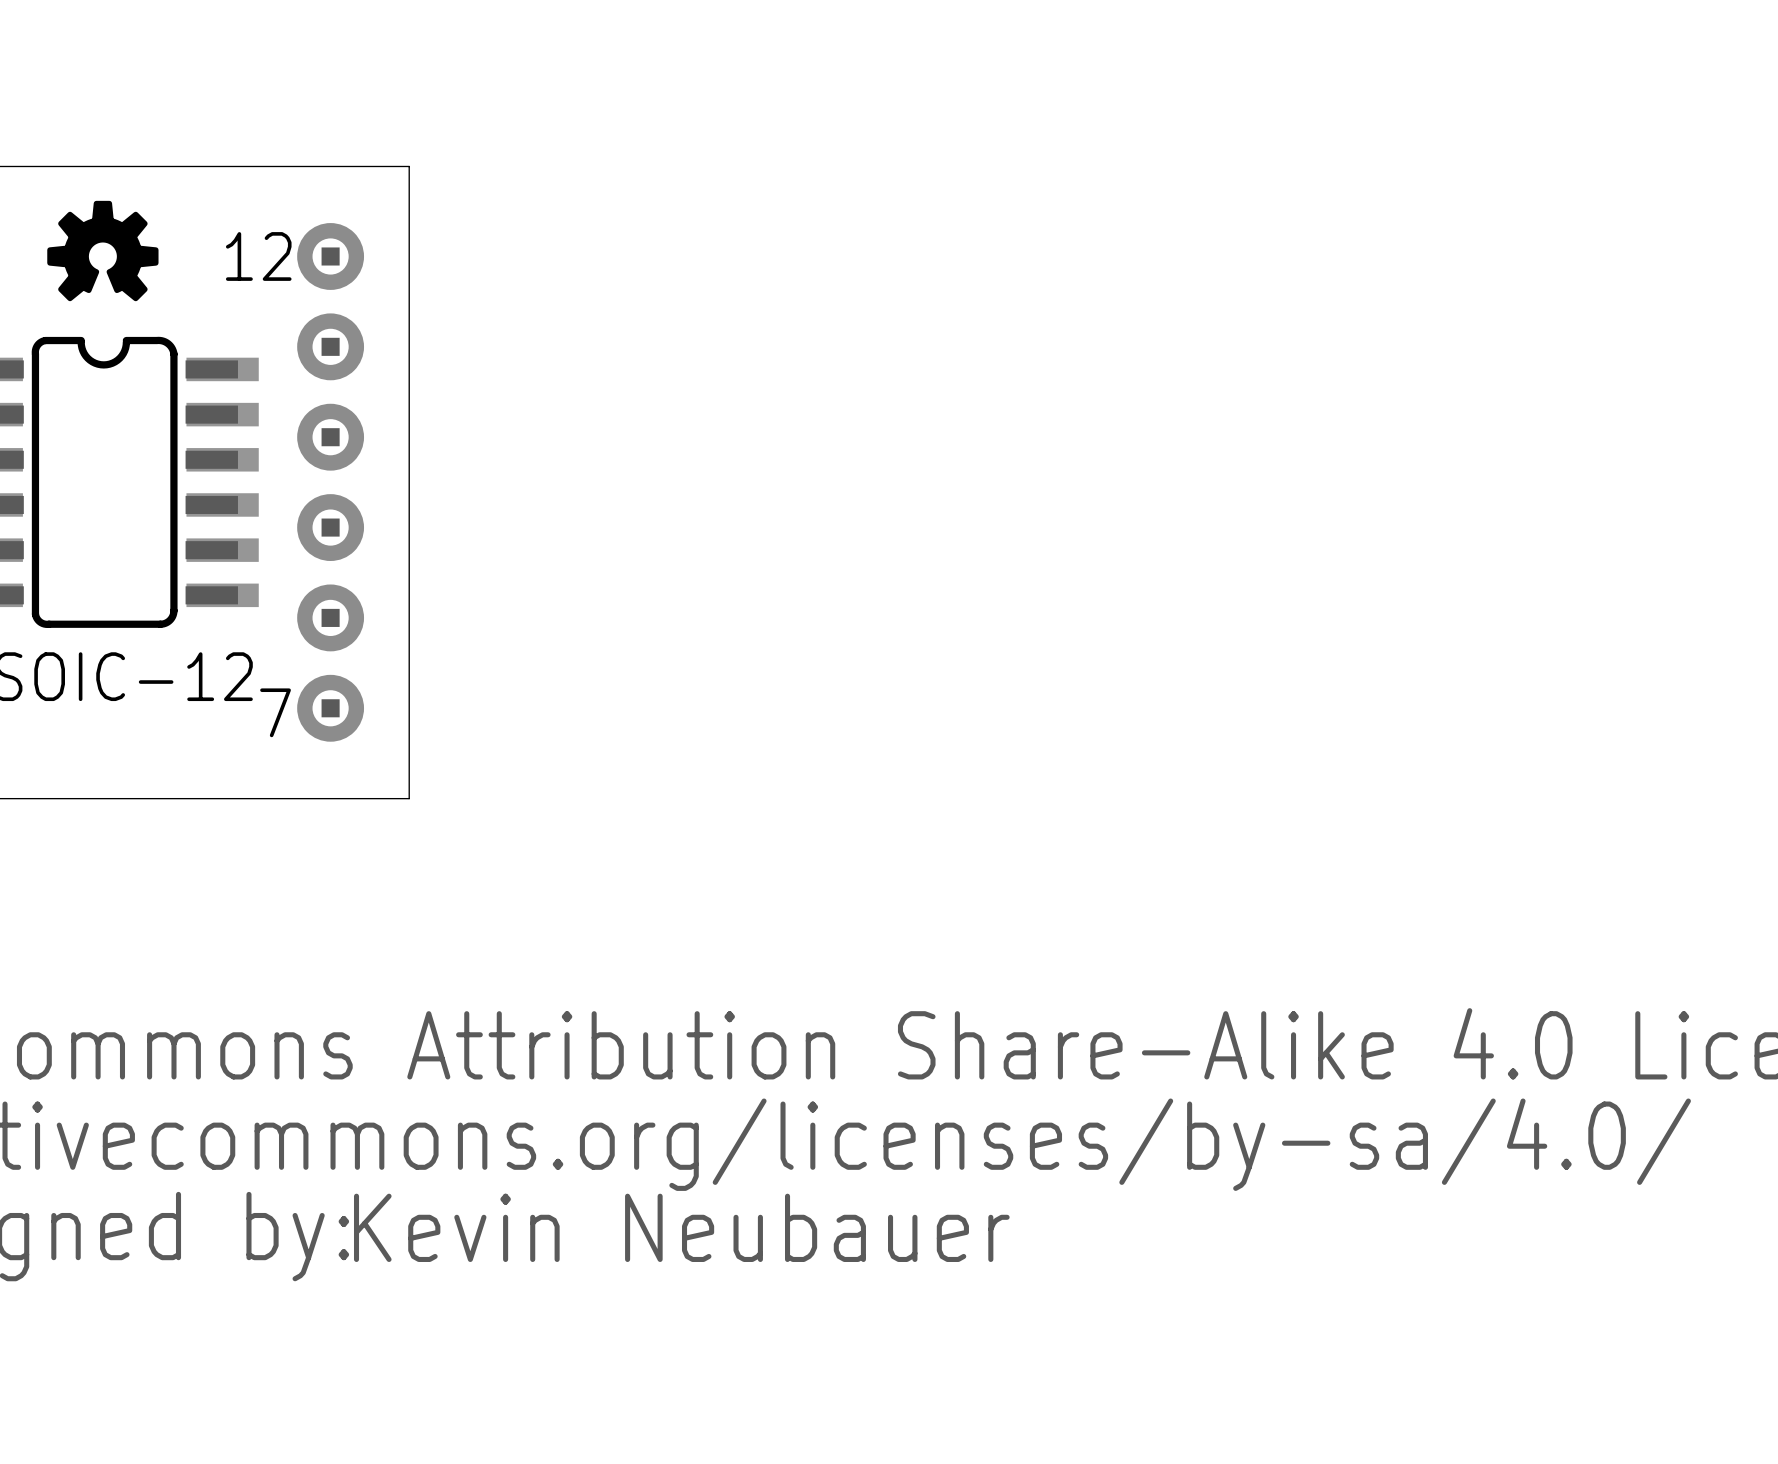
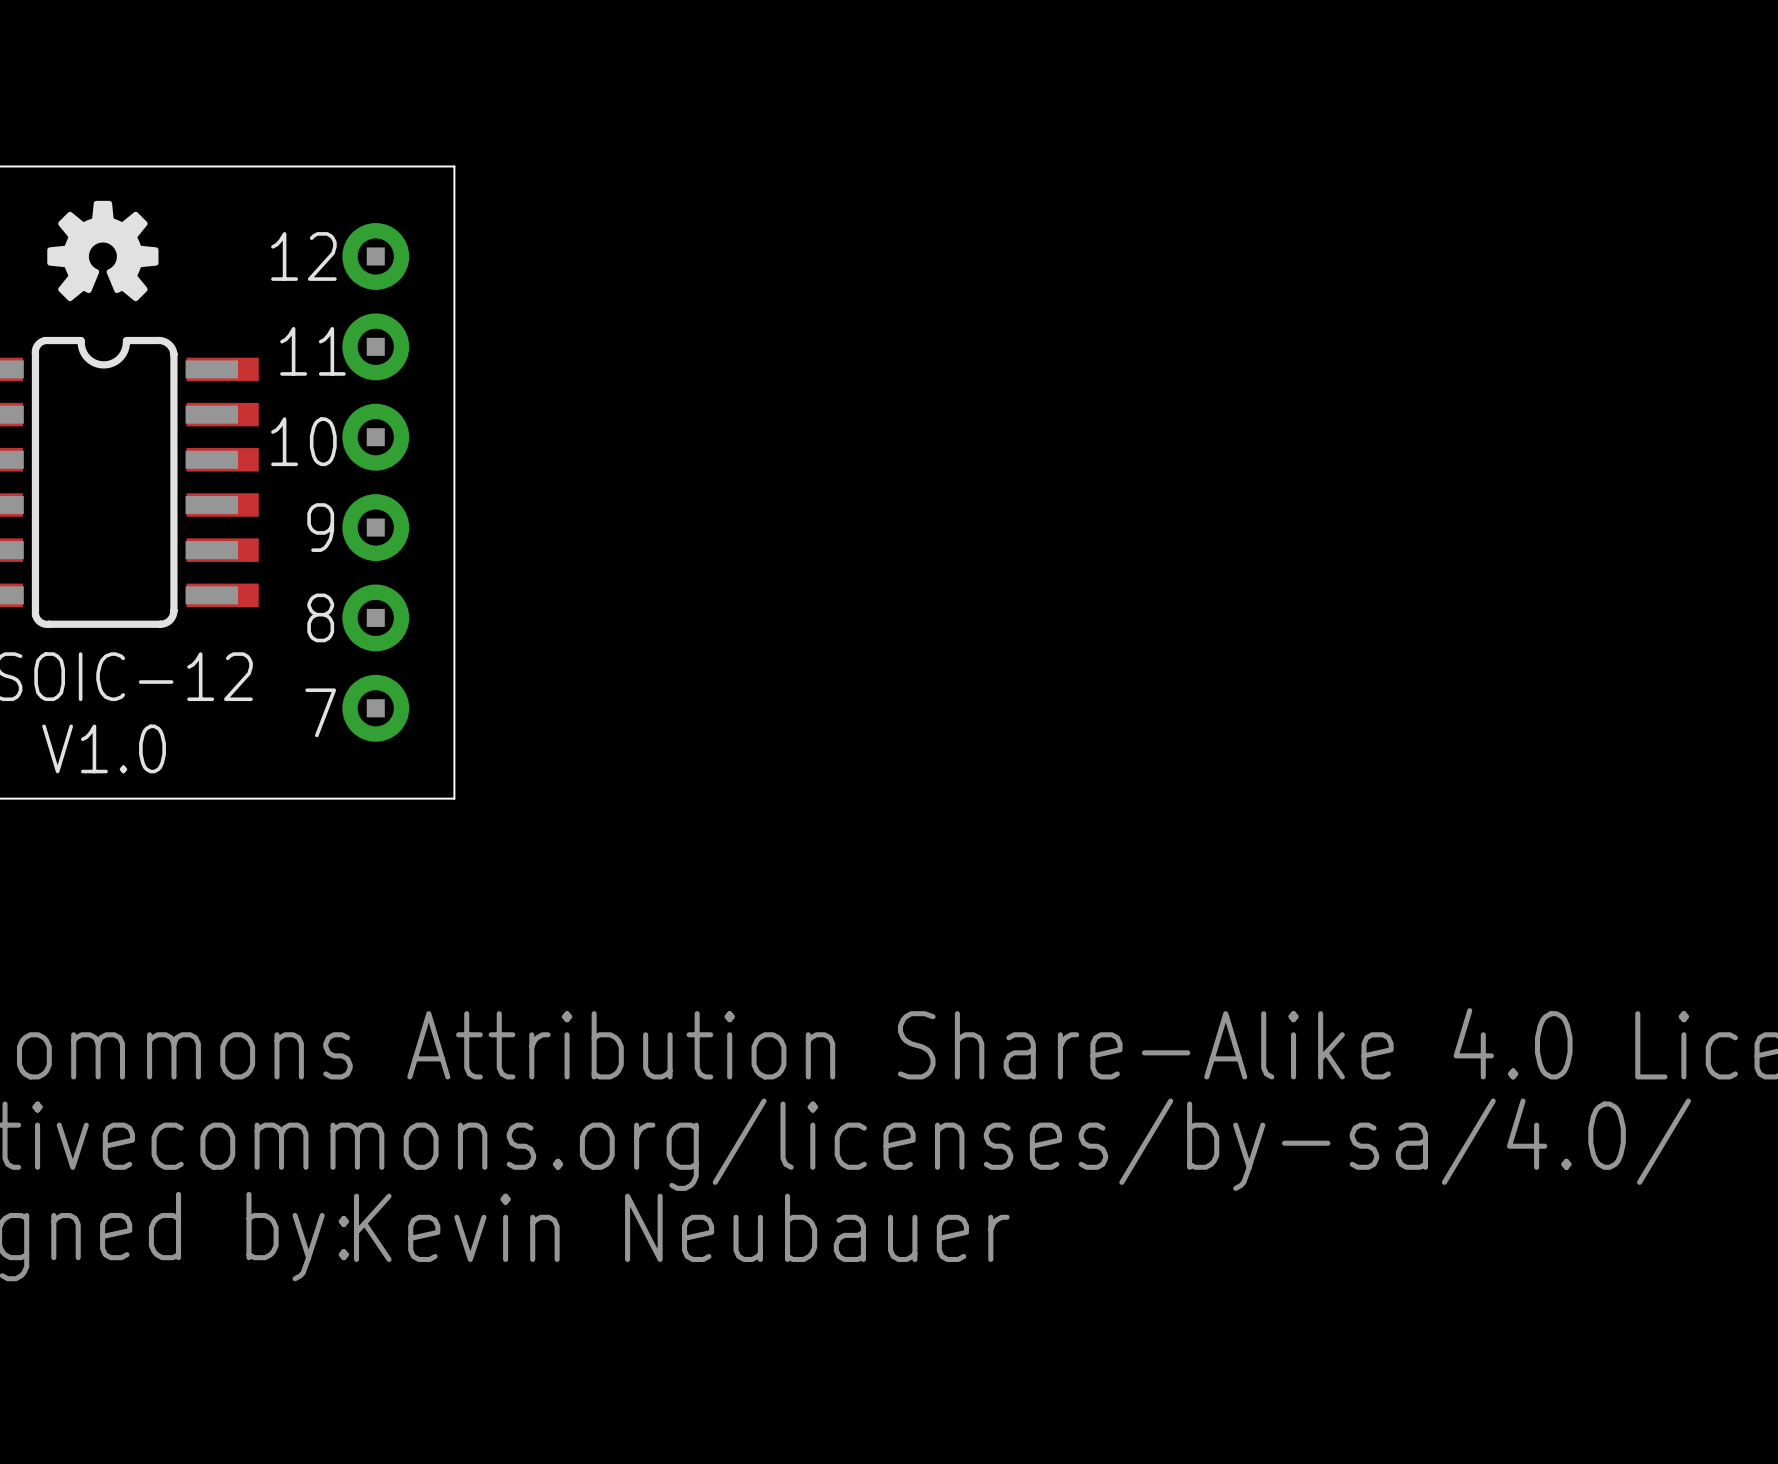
board edge: (409, 166) (409, 798) -> (409, 166) (454, 166) (454, 798) (409, 798)
text position: 12 (258, 256) -> 12 (303, 256)
text: none -> 11 (312, 351)
text: none -> 10 (303, 441)
part position: (330, 482) -> (375, 482)
text: none -> 9 (320, 527)
text: none -> 8 (320, 617)
text position: 7 (275, 712) -> 7 (320, 712)
text: none -> V1.0 (104, 748)

